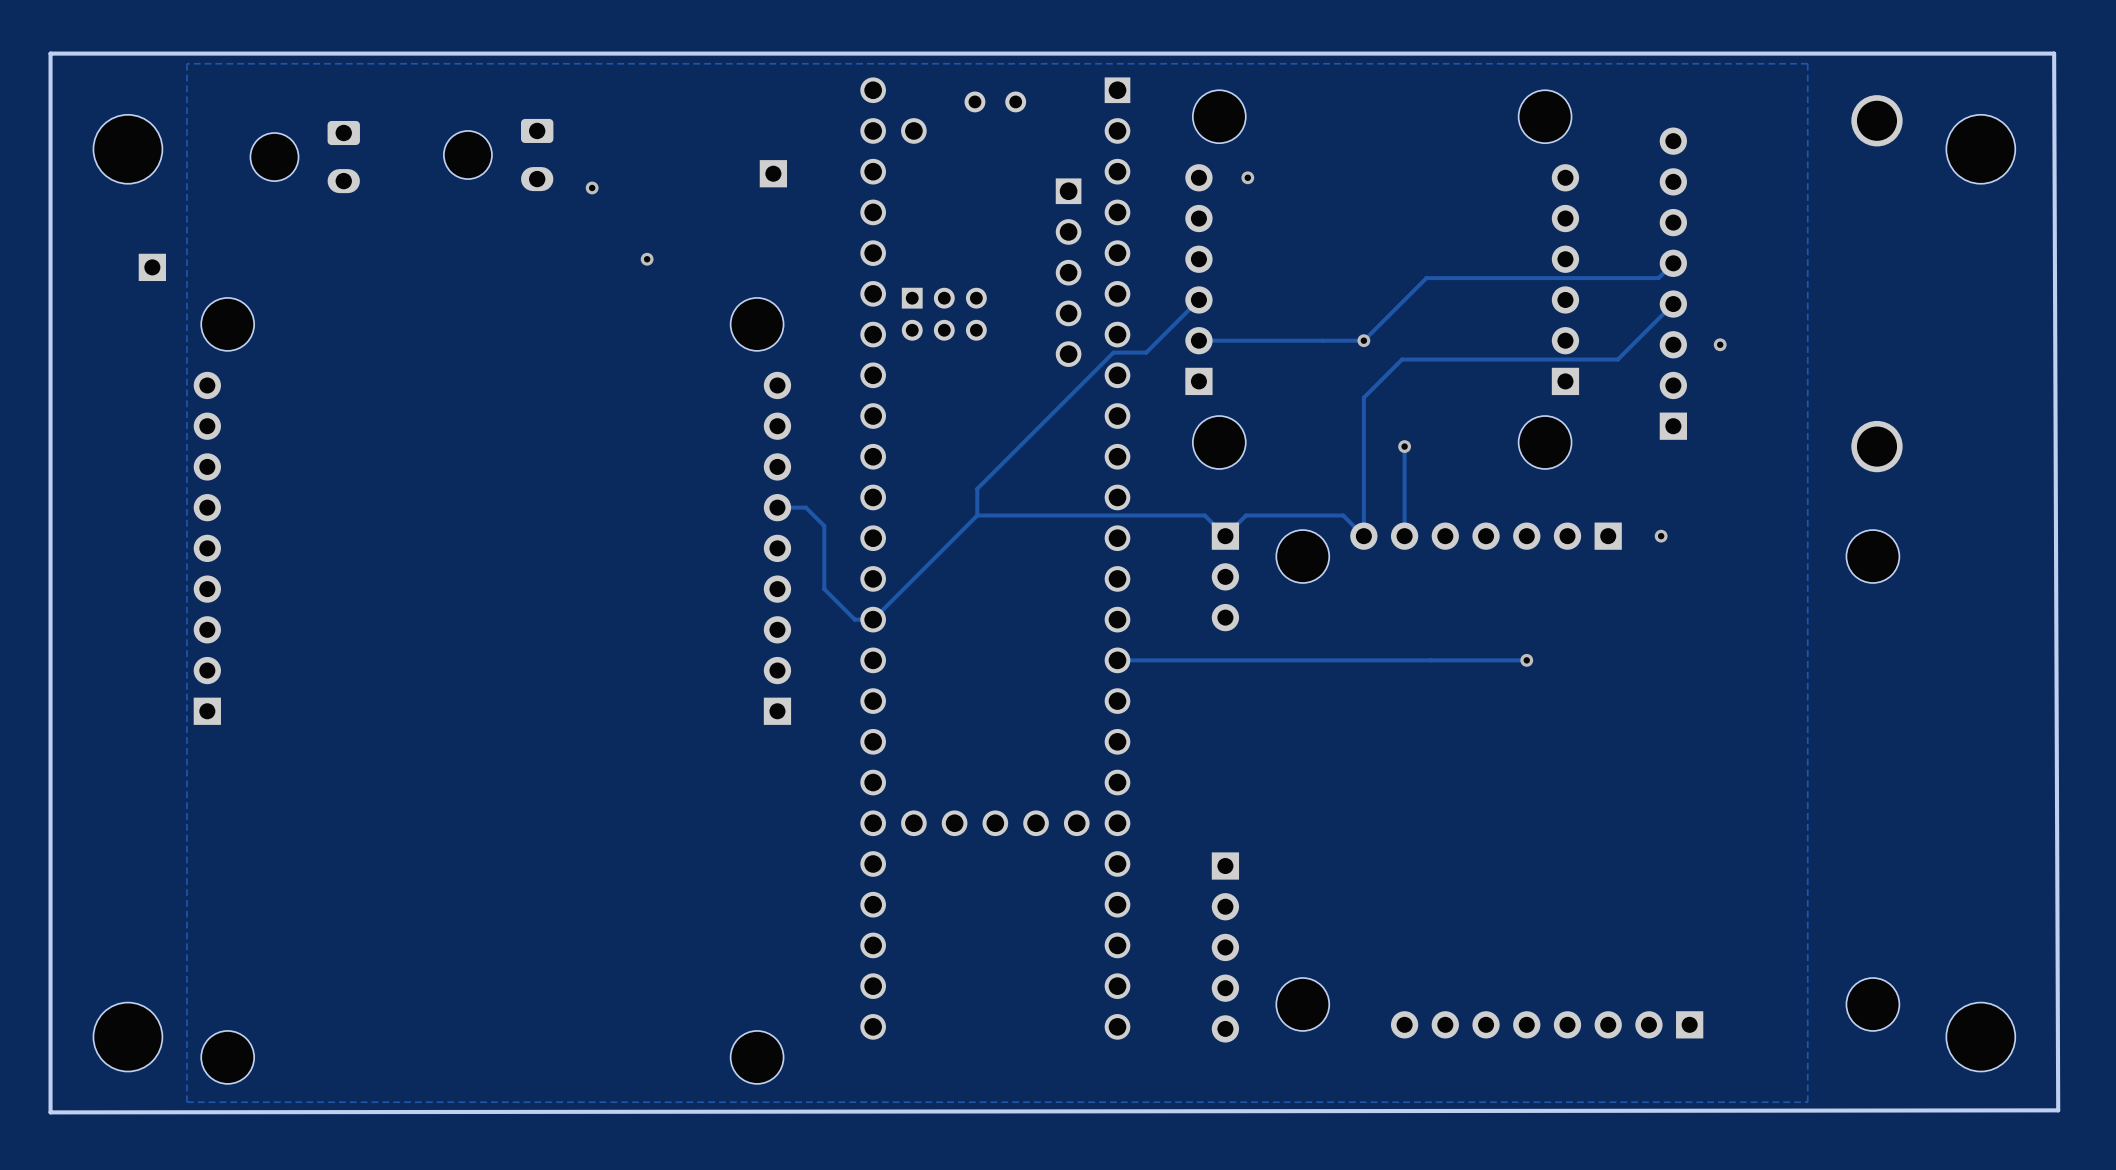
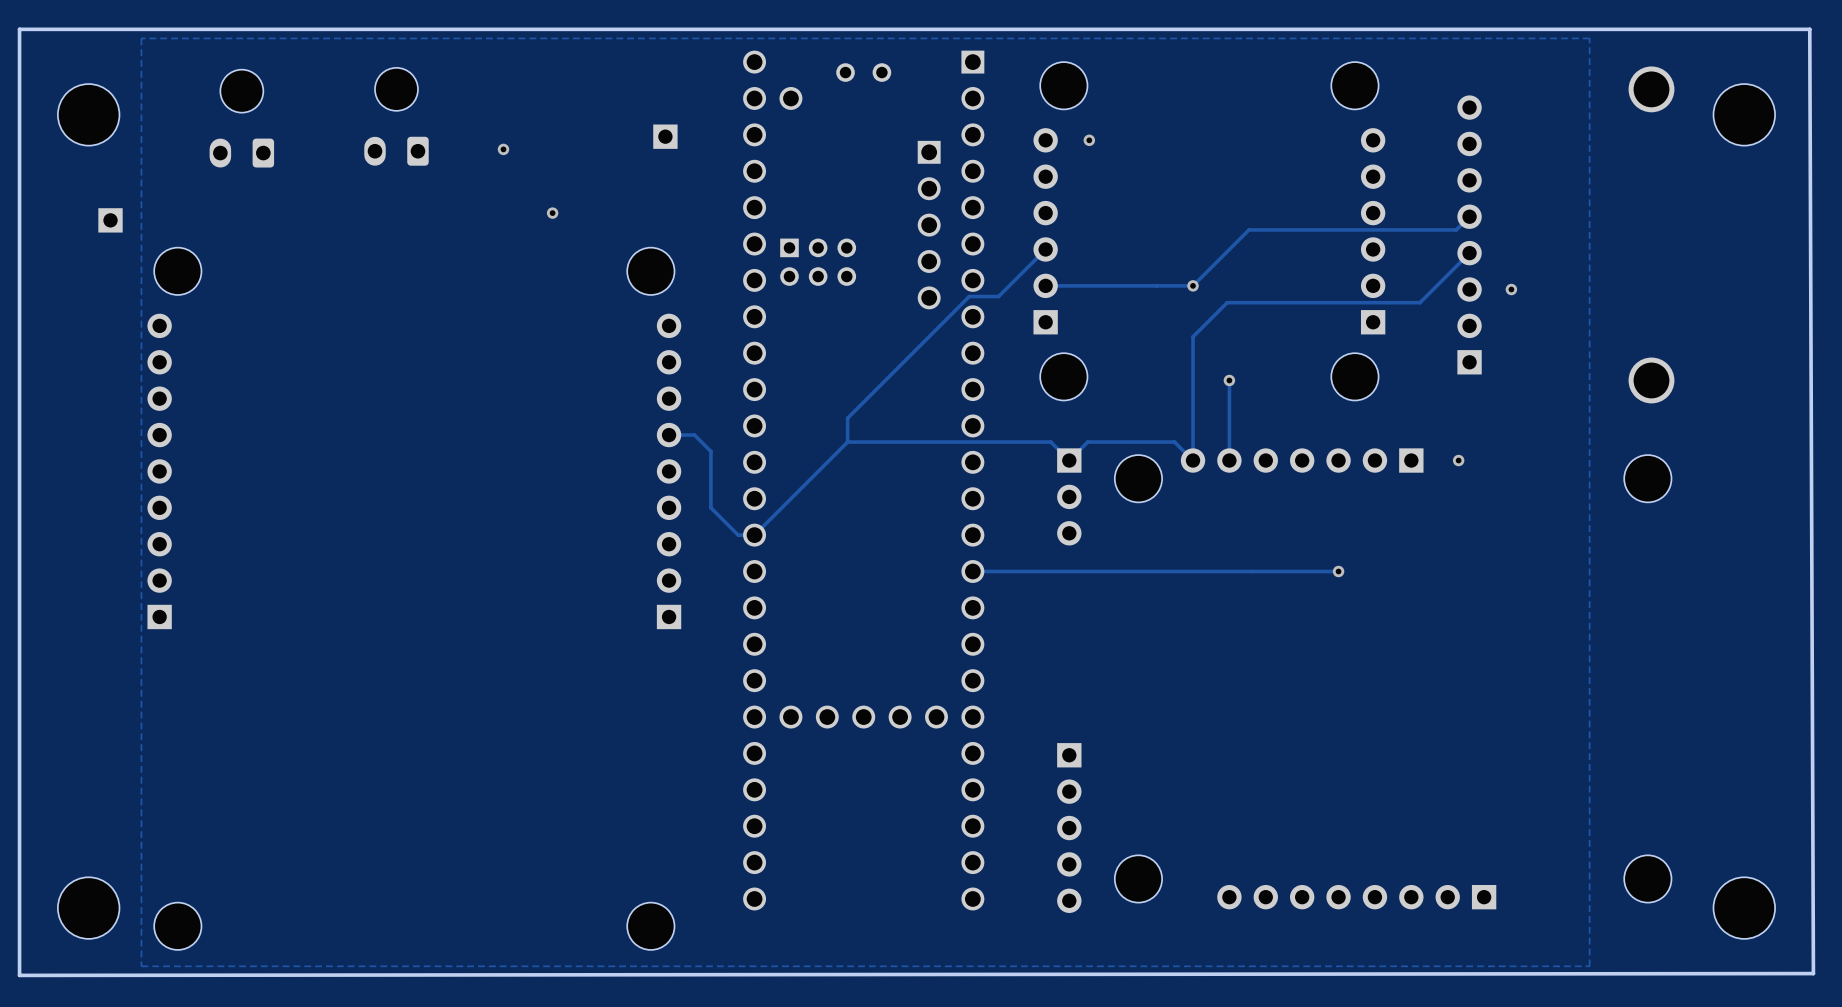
part rotation: 0° (498, 155) -> 90° clockwise (396, 116)
part rotation: 0° (305, 157) -> 90° clockwise (241, 118)

